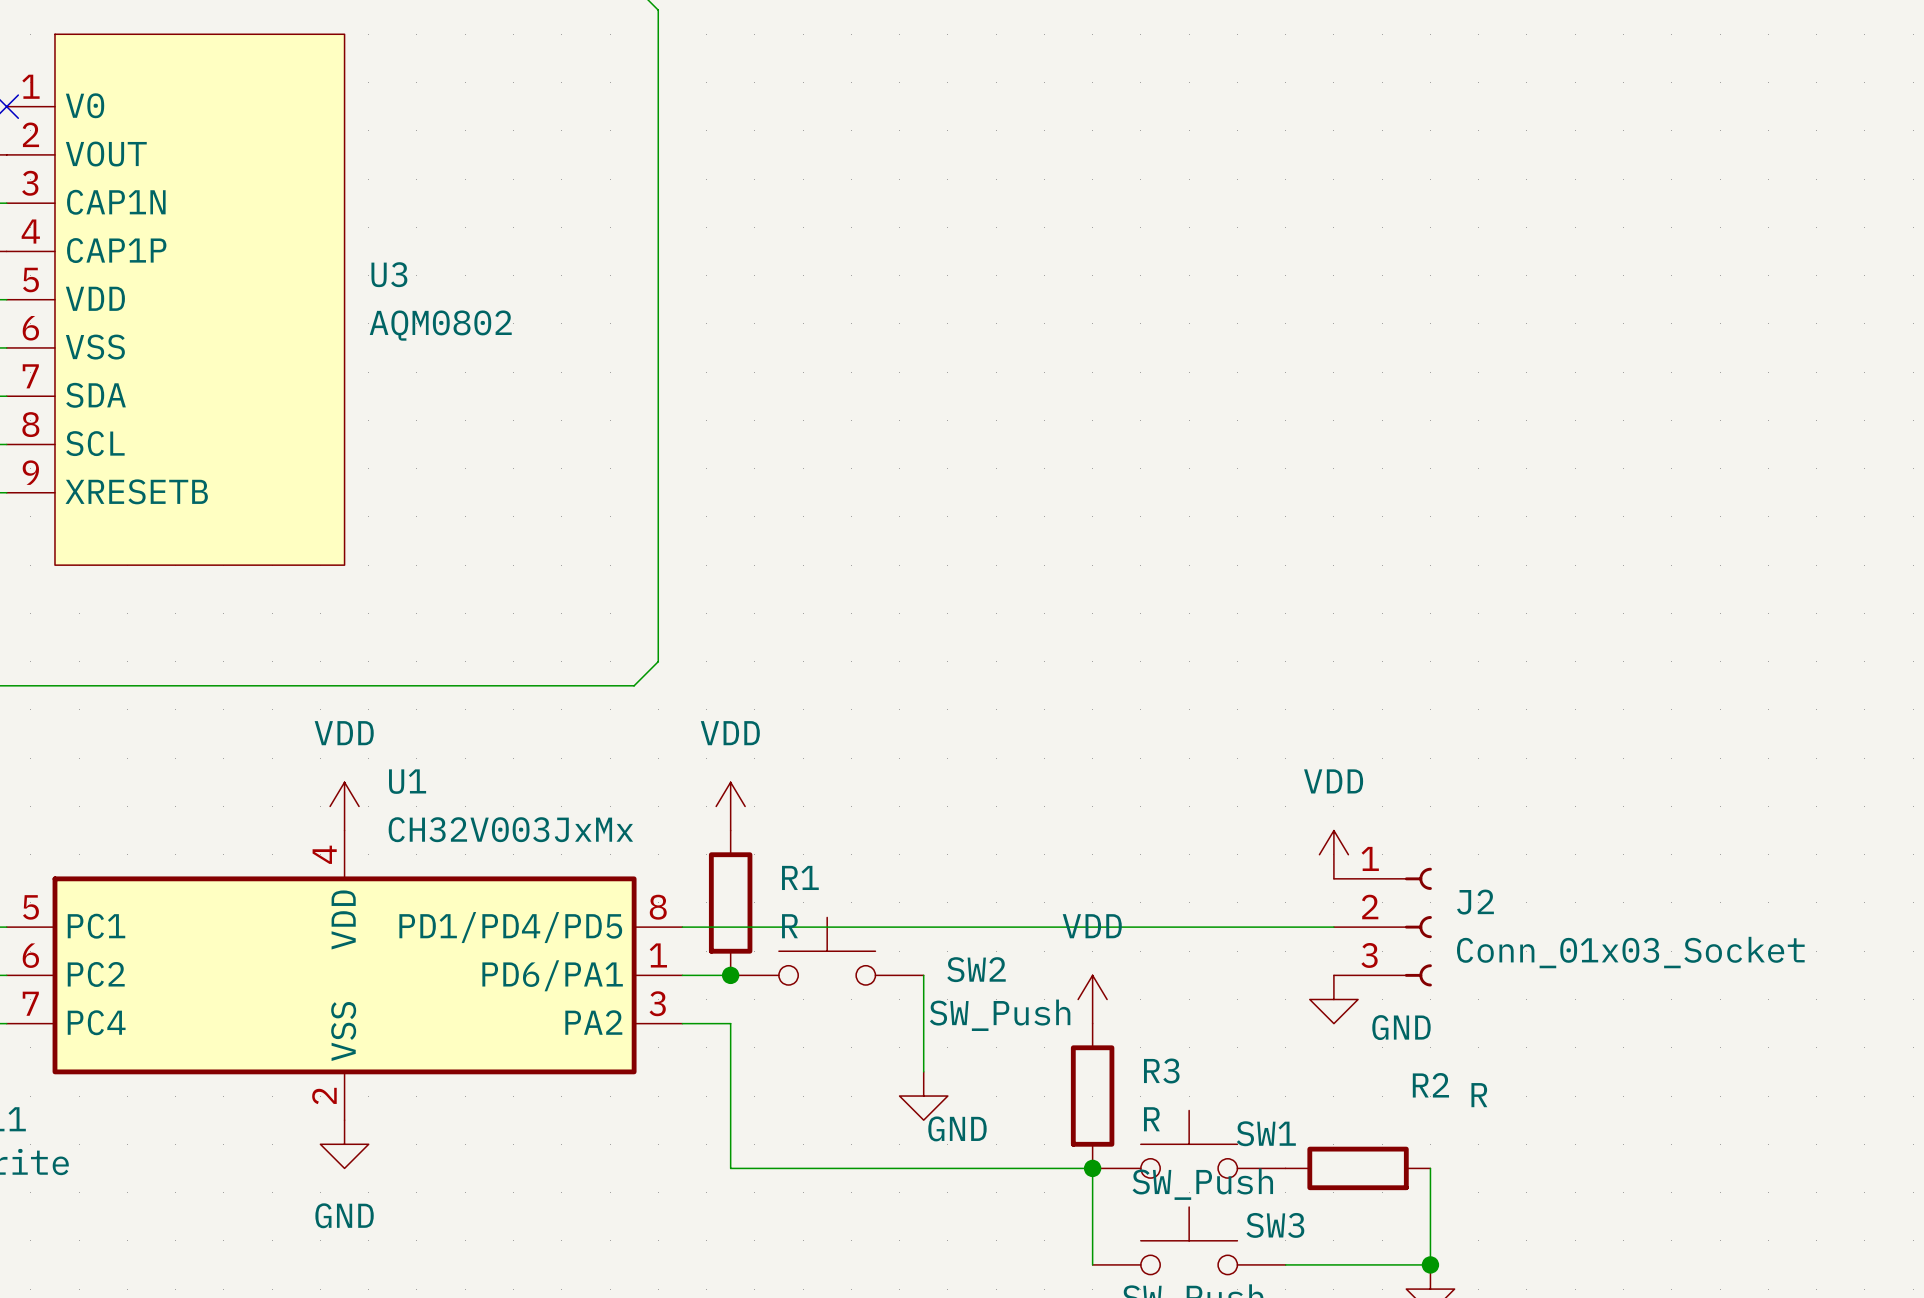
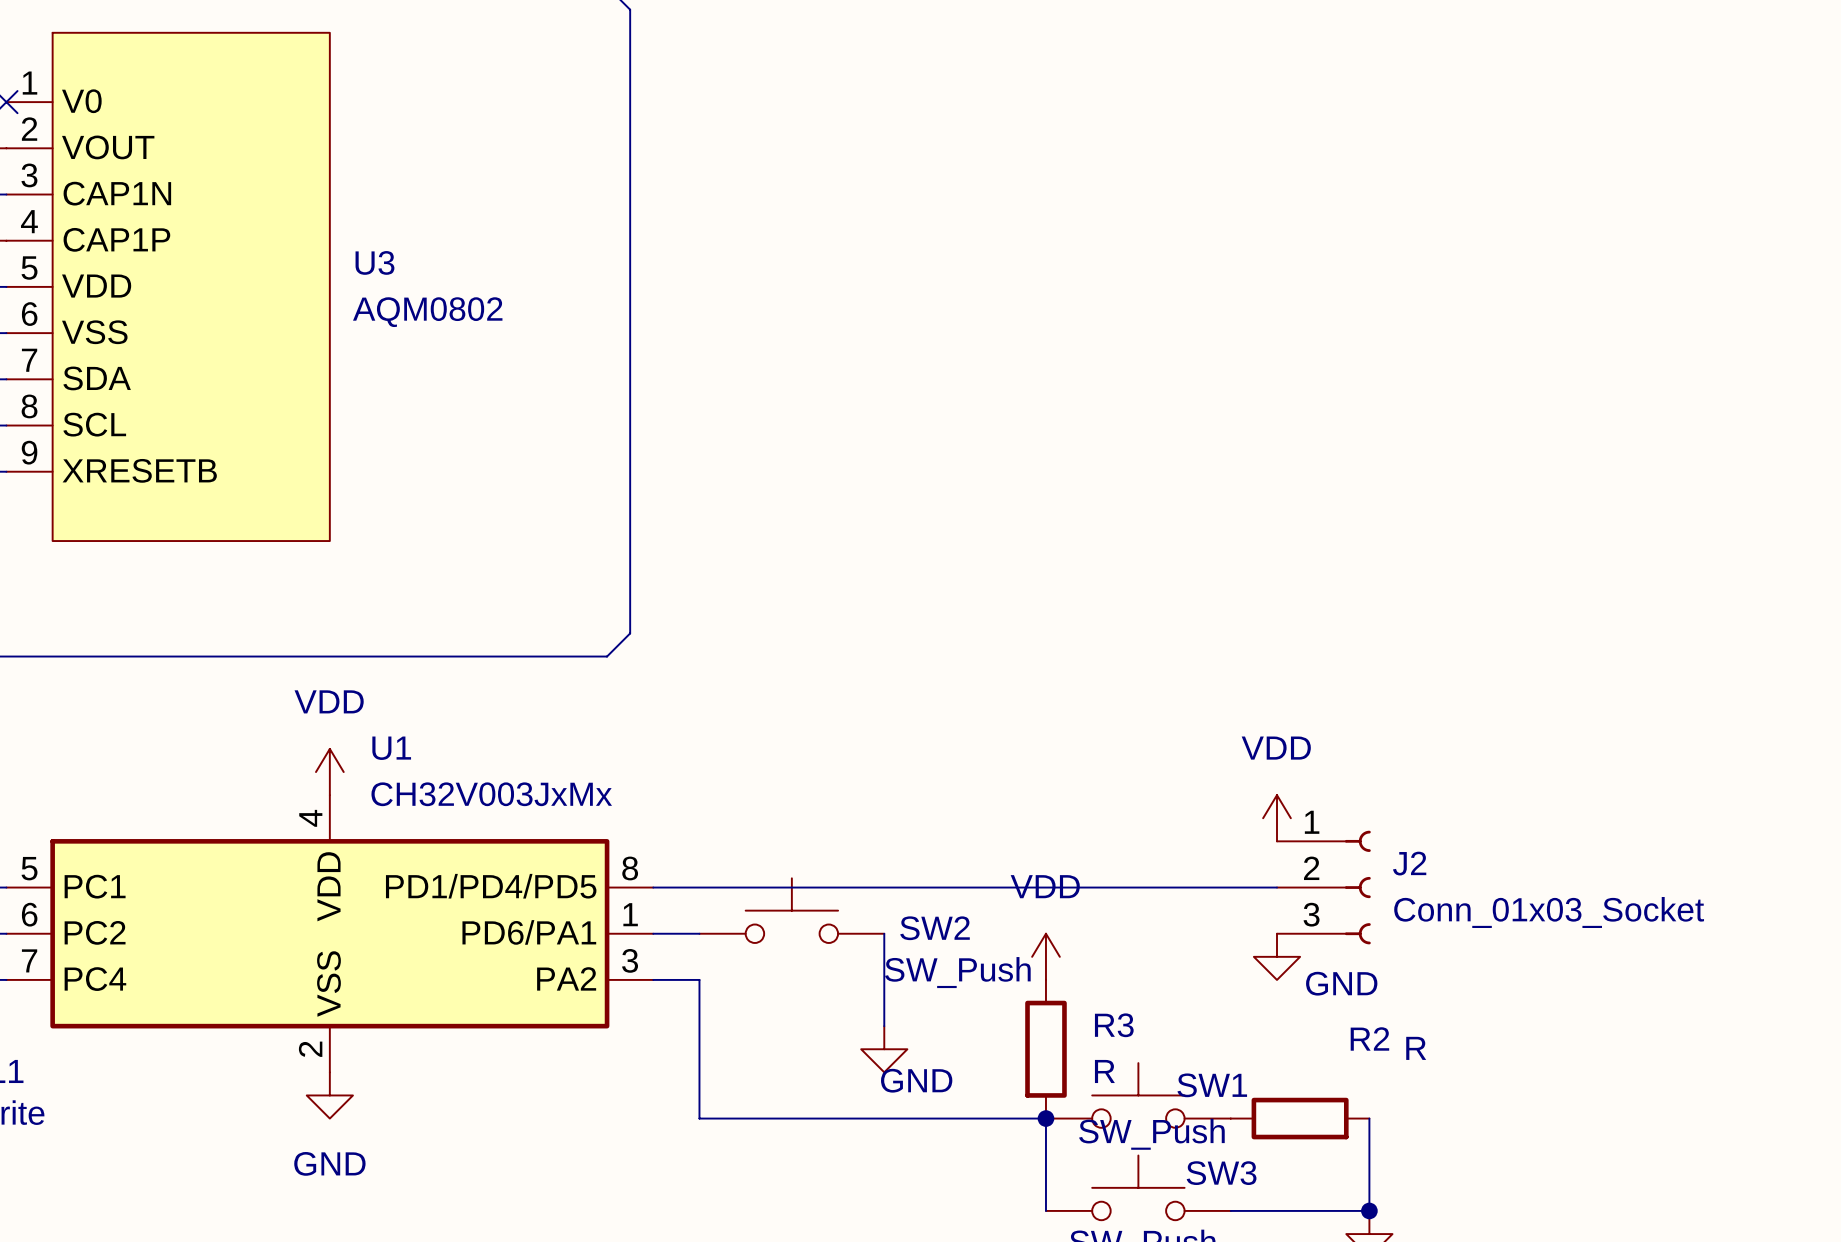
power symbol: VDD (730, 806) -> none
R1: R (730, 902) -> none
junction: (730, 975) -> none

